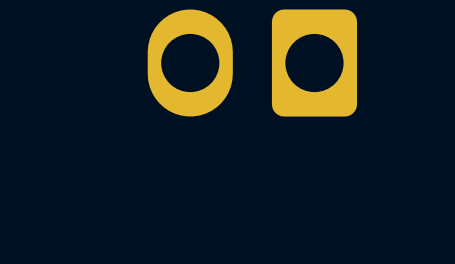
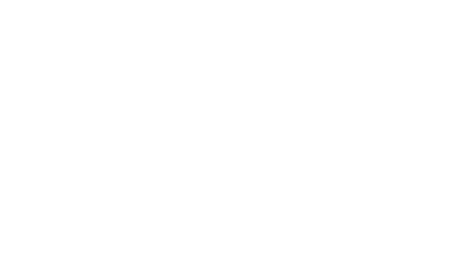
part: (252, 63) -> none

